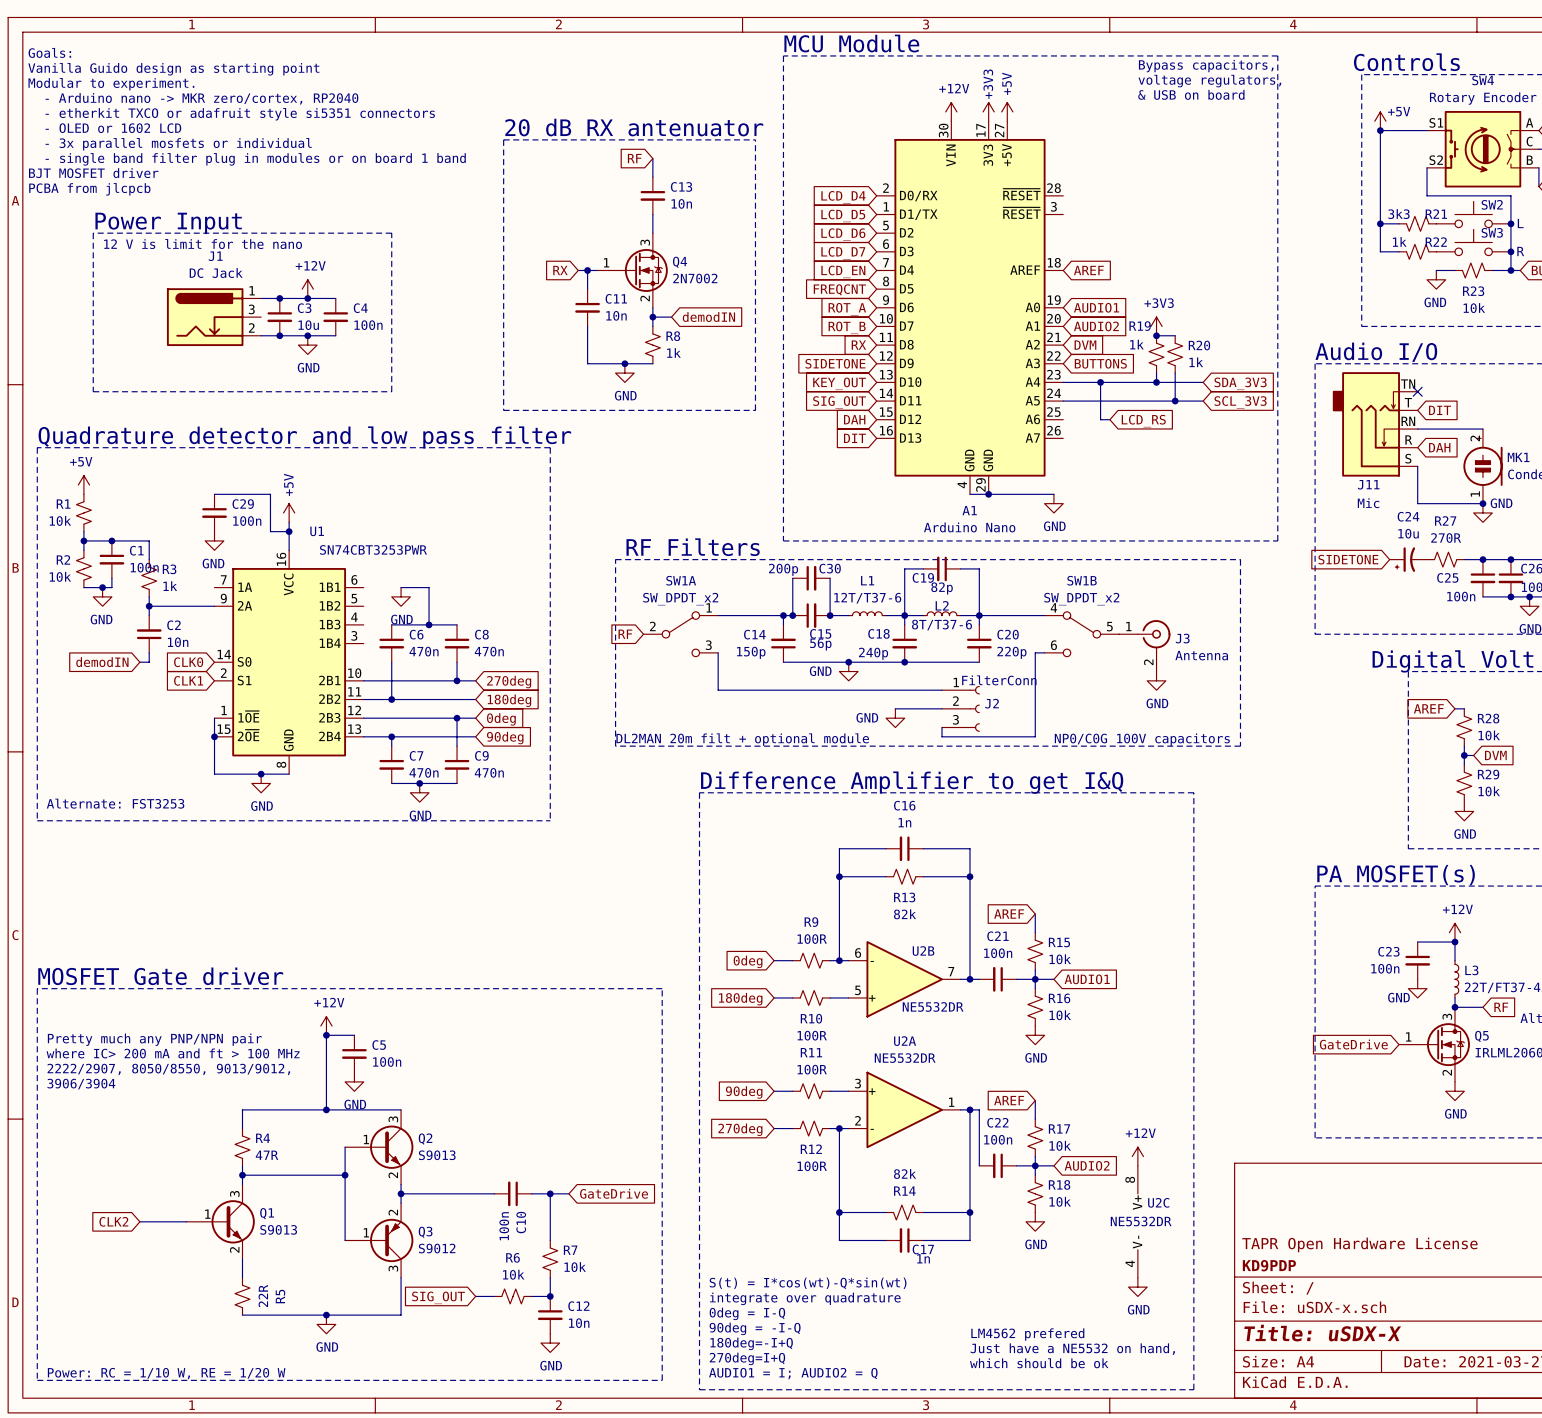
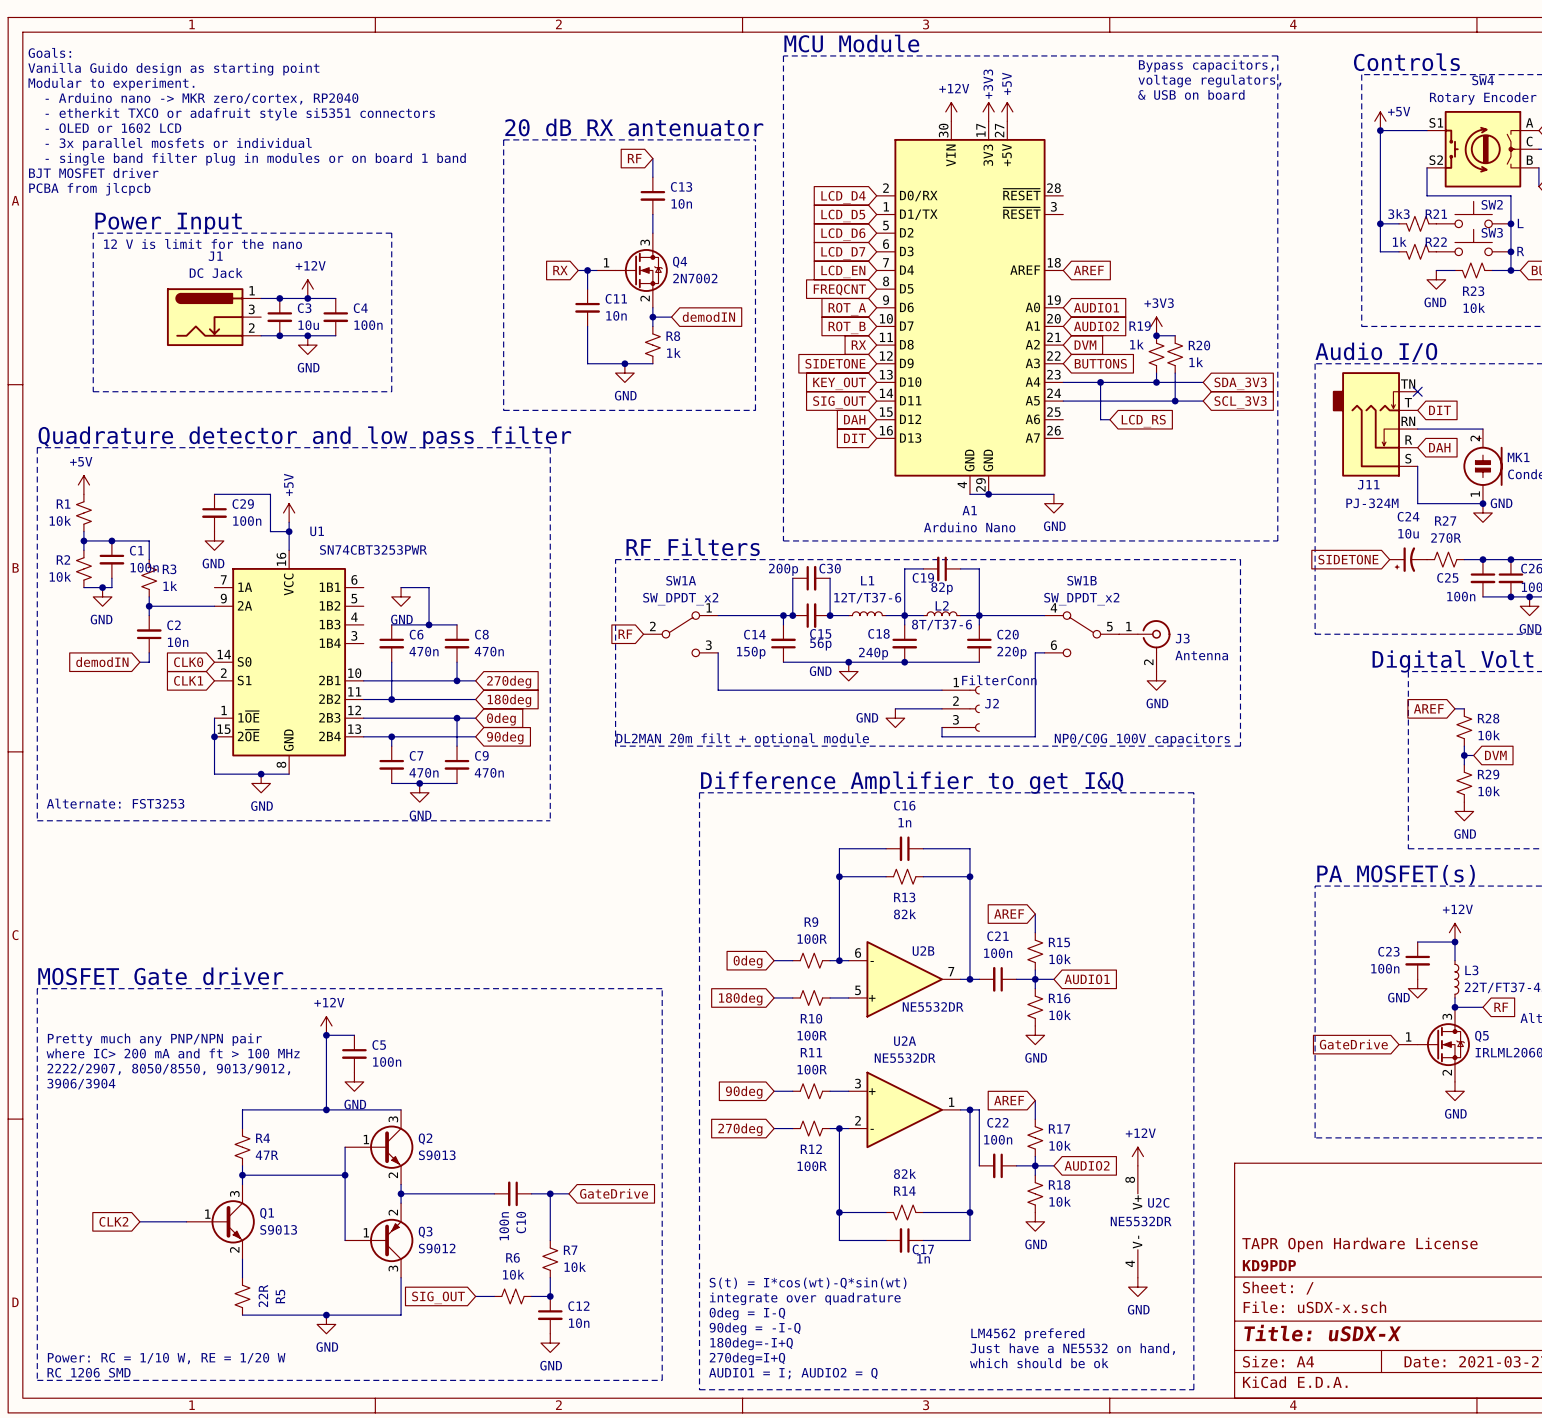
J11 value: Mic (1368, 503) -> PJ-324M (1372, 503)
text: none -> Power: RC = 1/10 W, RE = 1/20 W (166, 1358)
text: Power: RC = 1/10 W, RE = 1/20 W (166, 1373) -> RC 1206 SMD (89, 1372)

